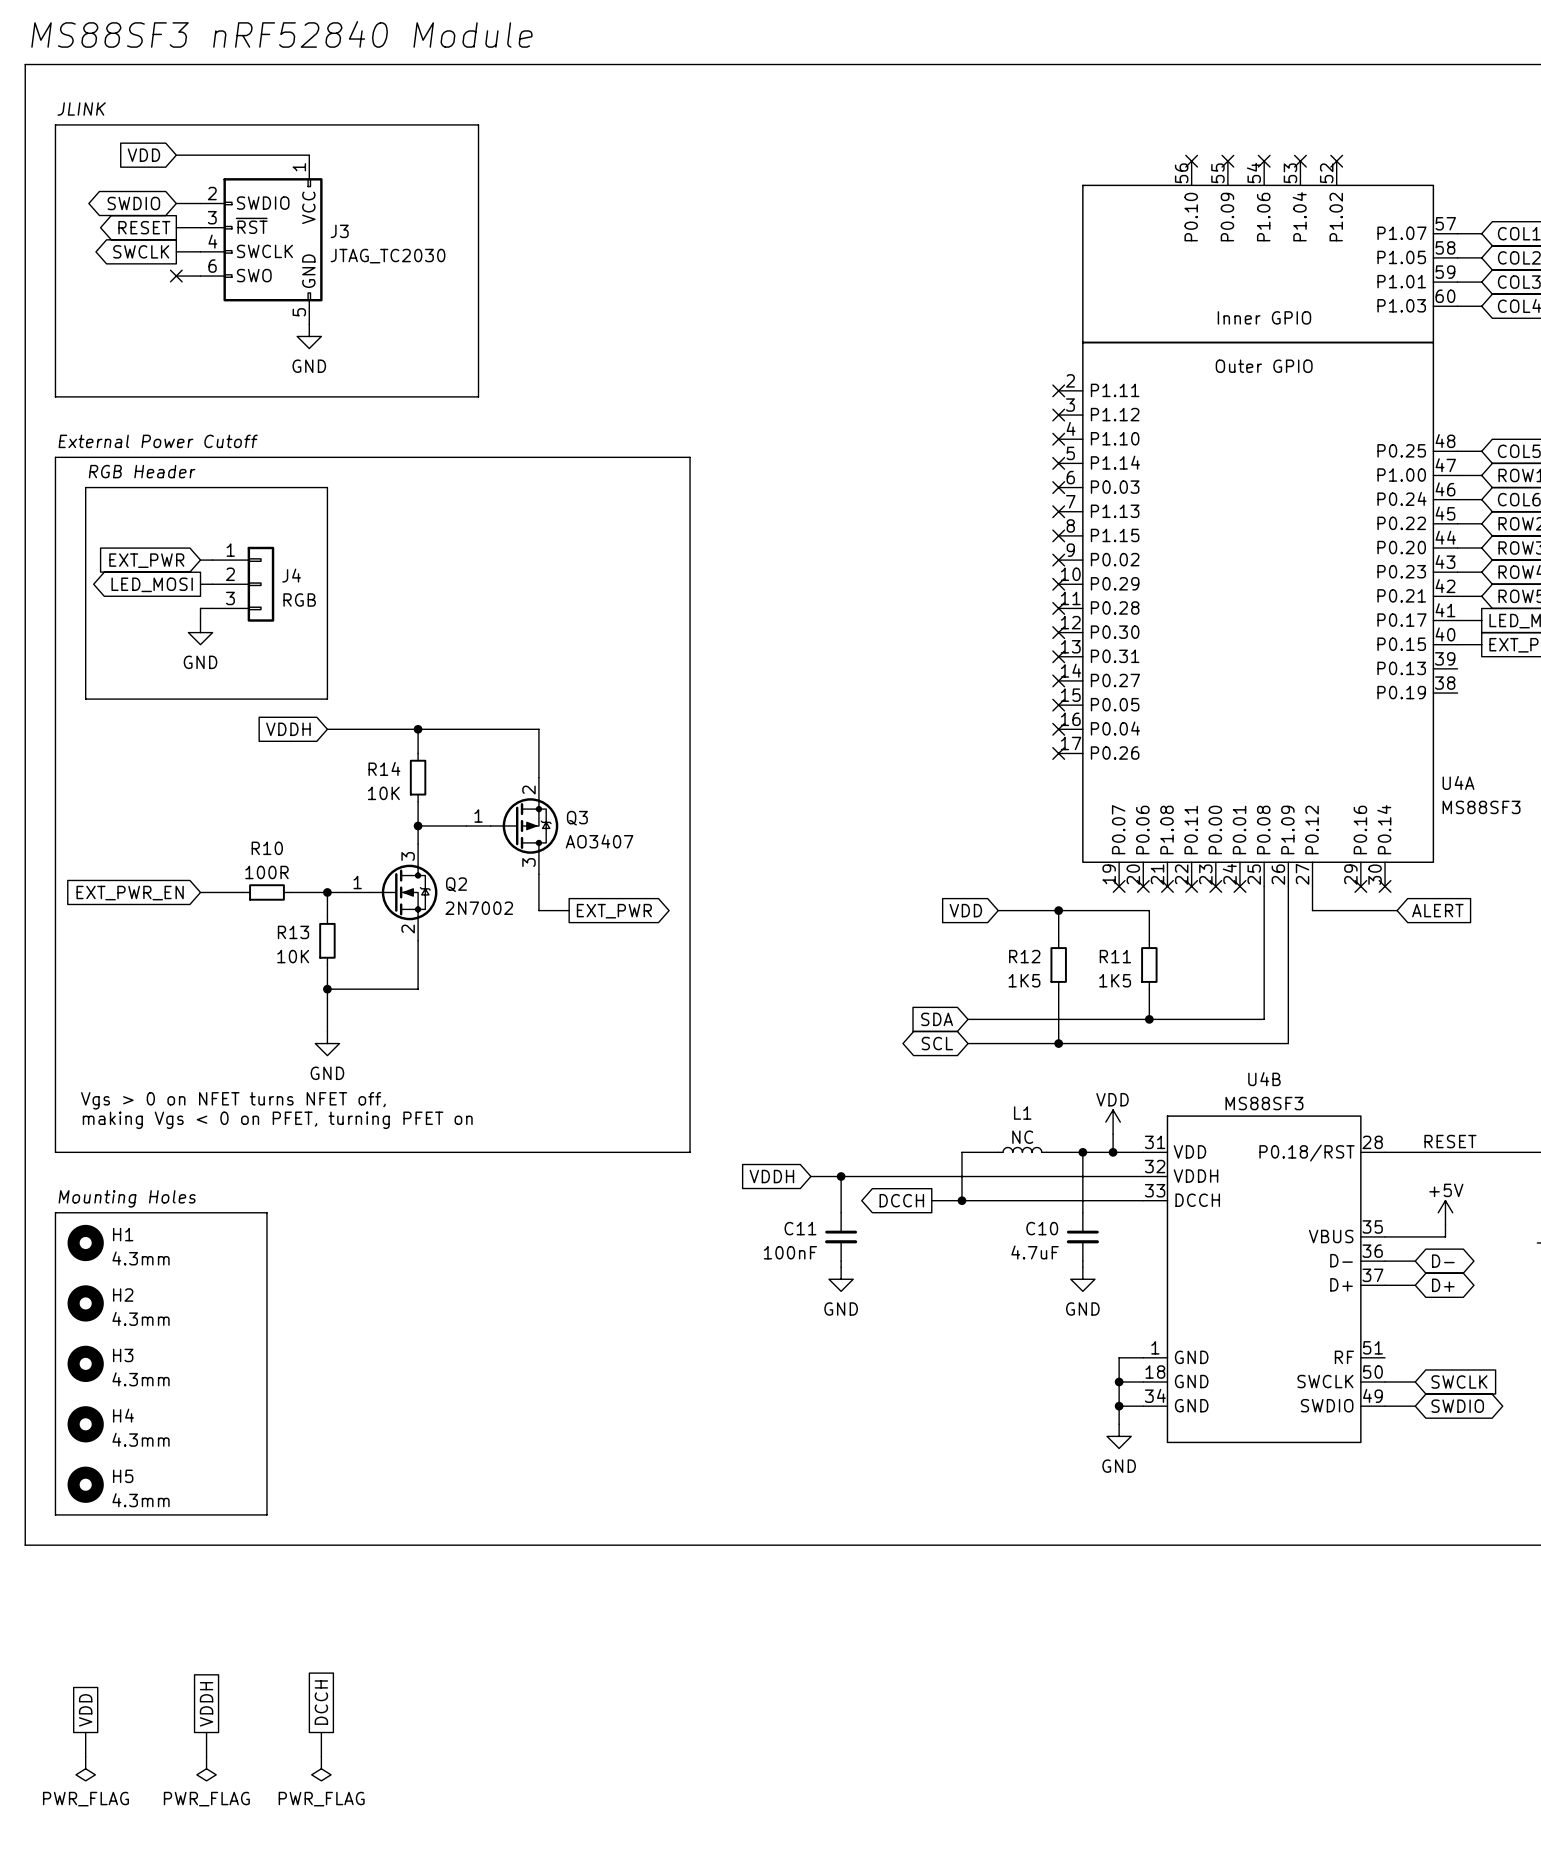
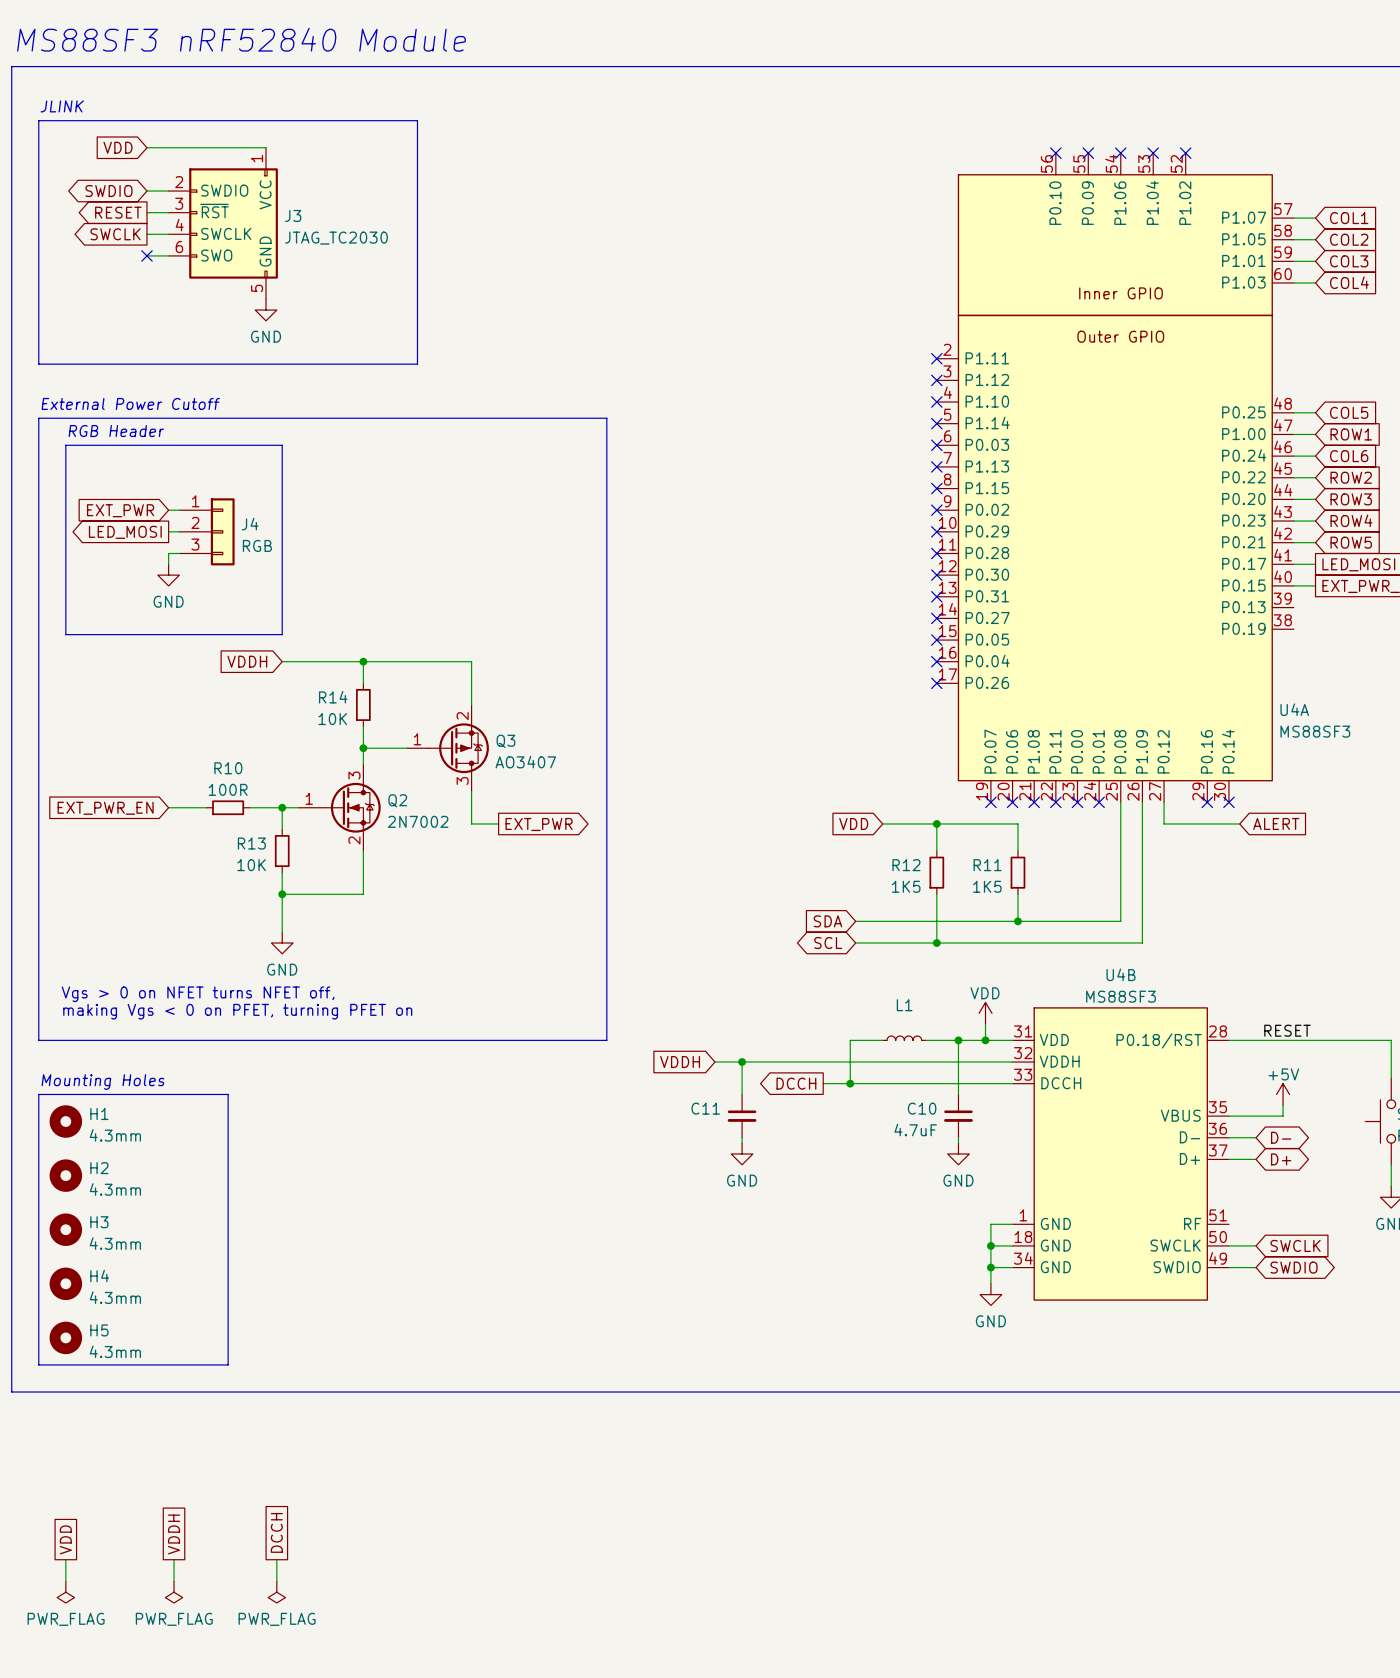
L1 value: NC (1022, 1137) -> none
C11 value: 100nF (790, 1252) -> none

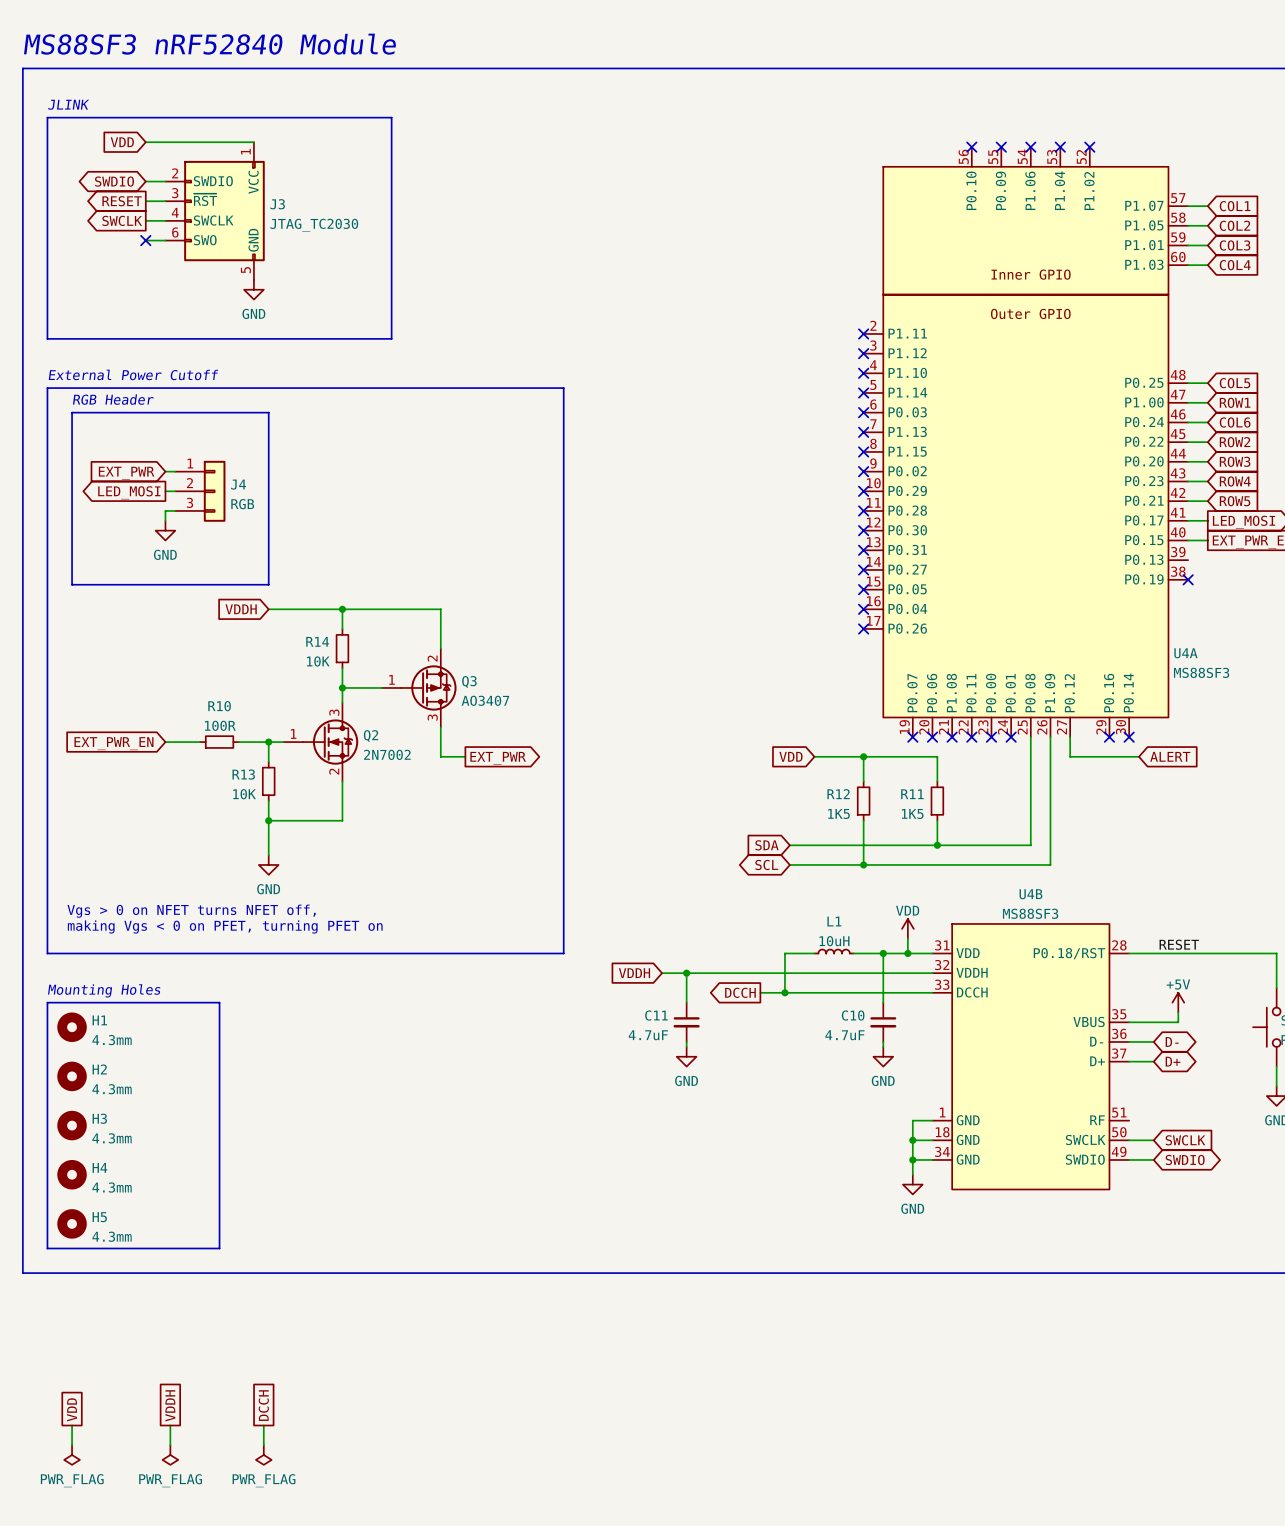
no-connect mark: none -> (1188, 579)
L1 value: none -> 10uH (834, 941)
C11 value: none -> 4.7uF (648, 1035)

